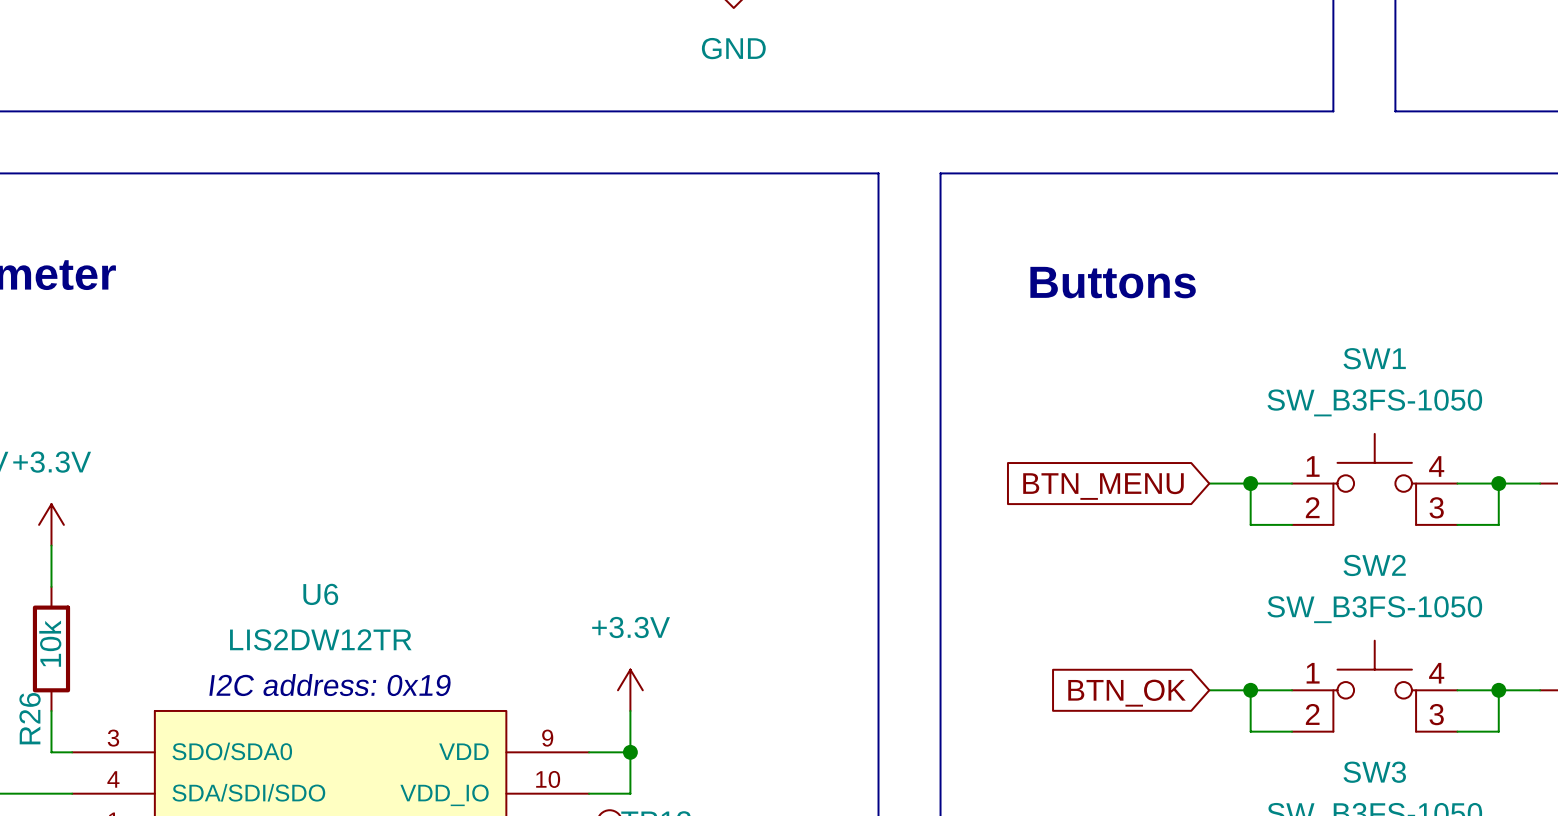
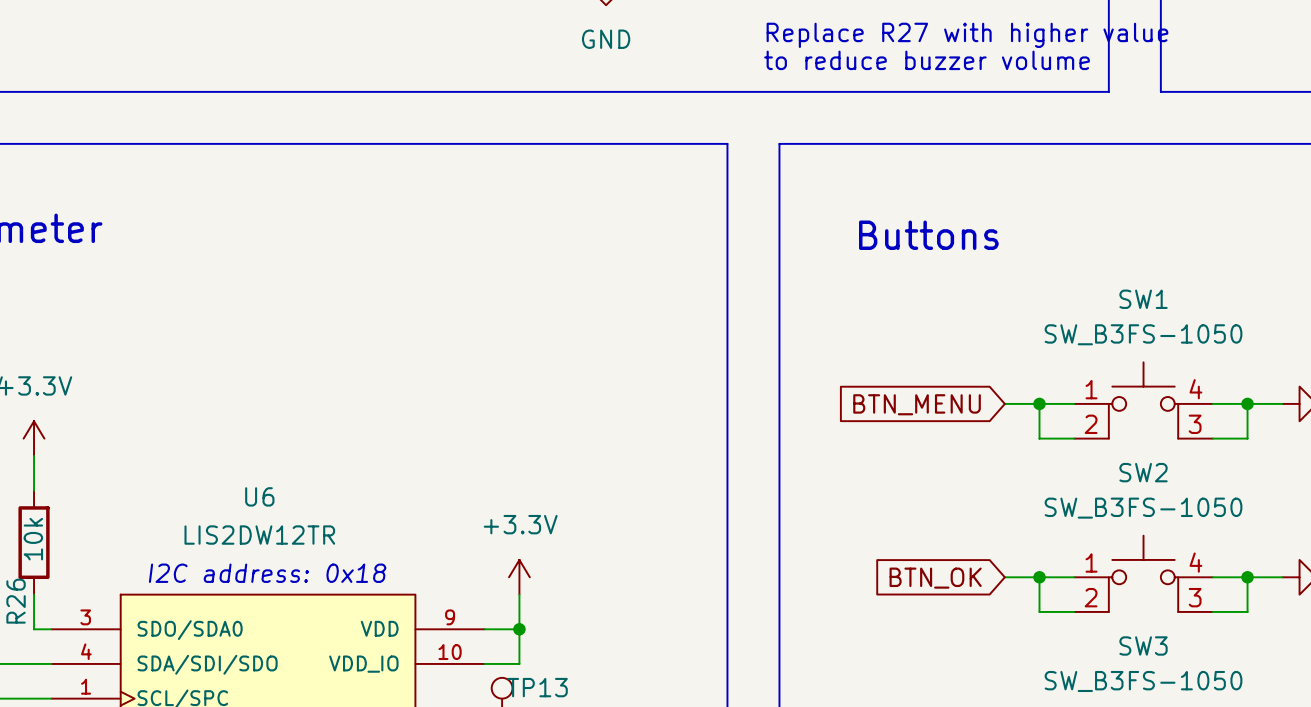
text: none -> Replace R27 with higher value (967, 35)
text: none -> to reduce buzzer volume (927, 60)
text: I2C address: 0x19 (330, 685) -> I2C address: 0x18 (267, 573)

